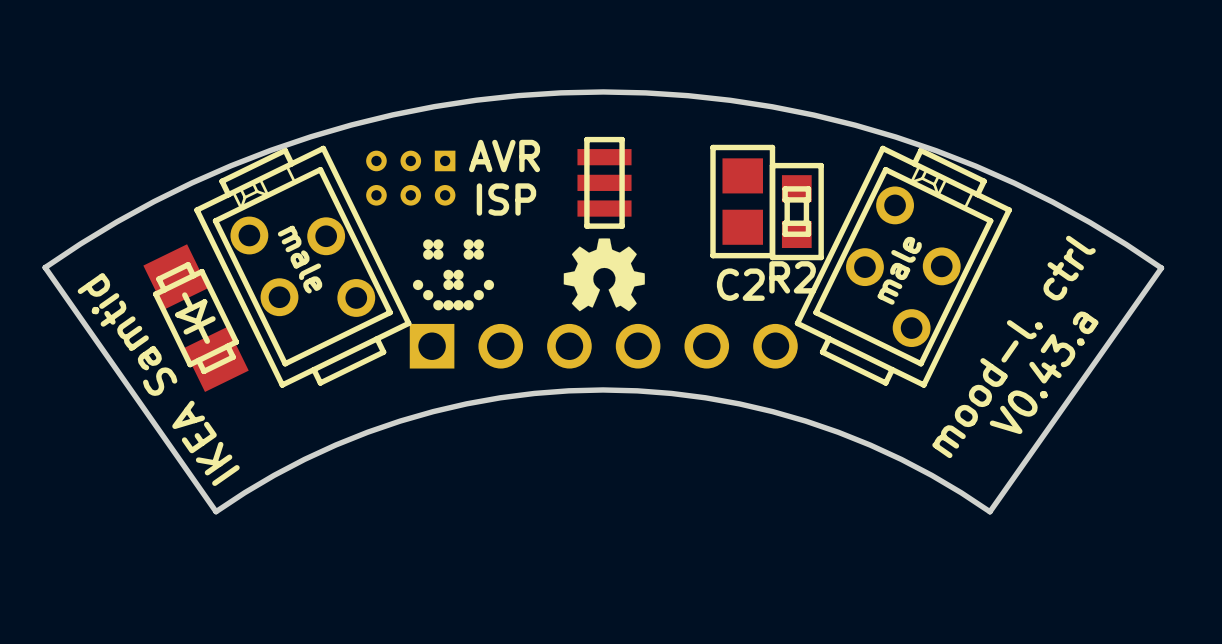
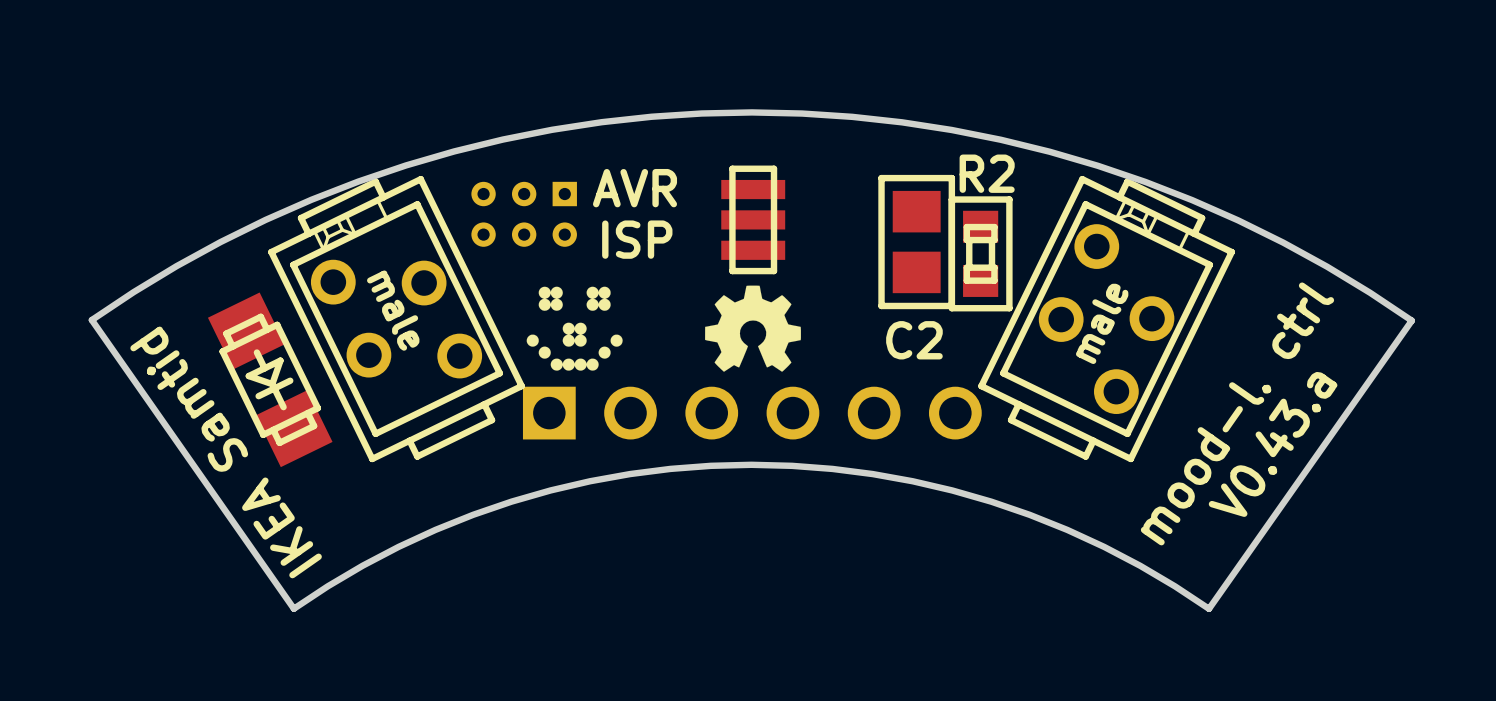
R2 name position: R2 (792, 277) -> R2 (987, 173)

